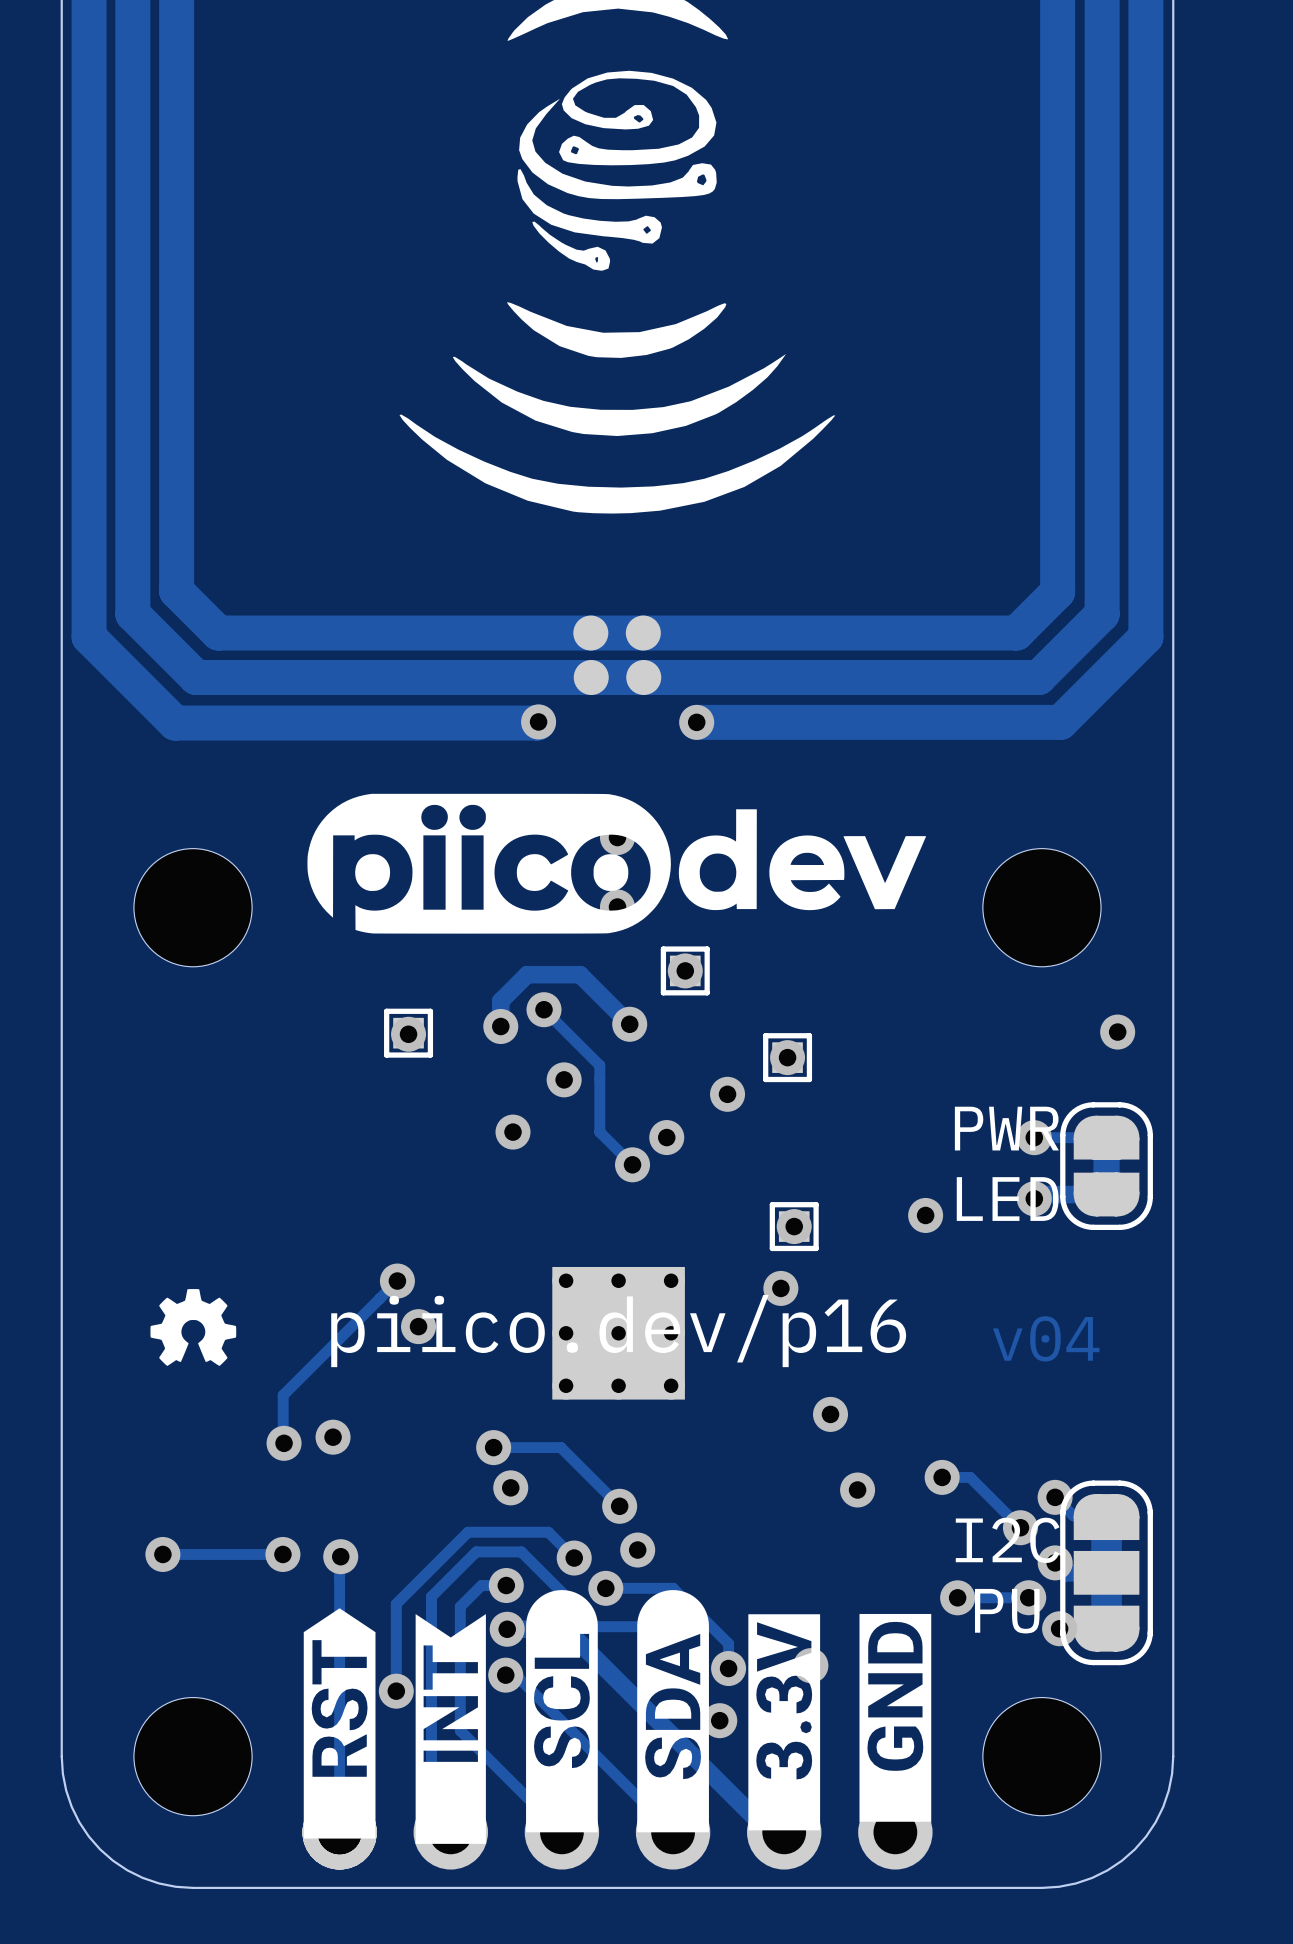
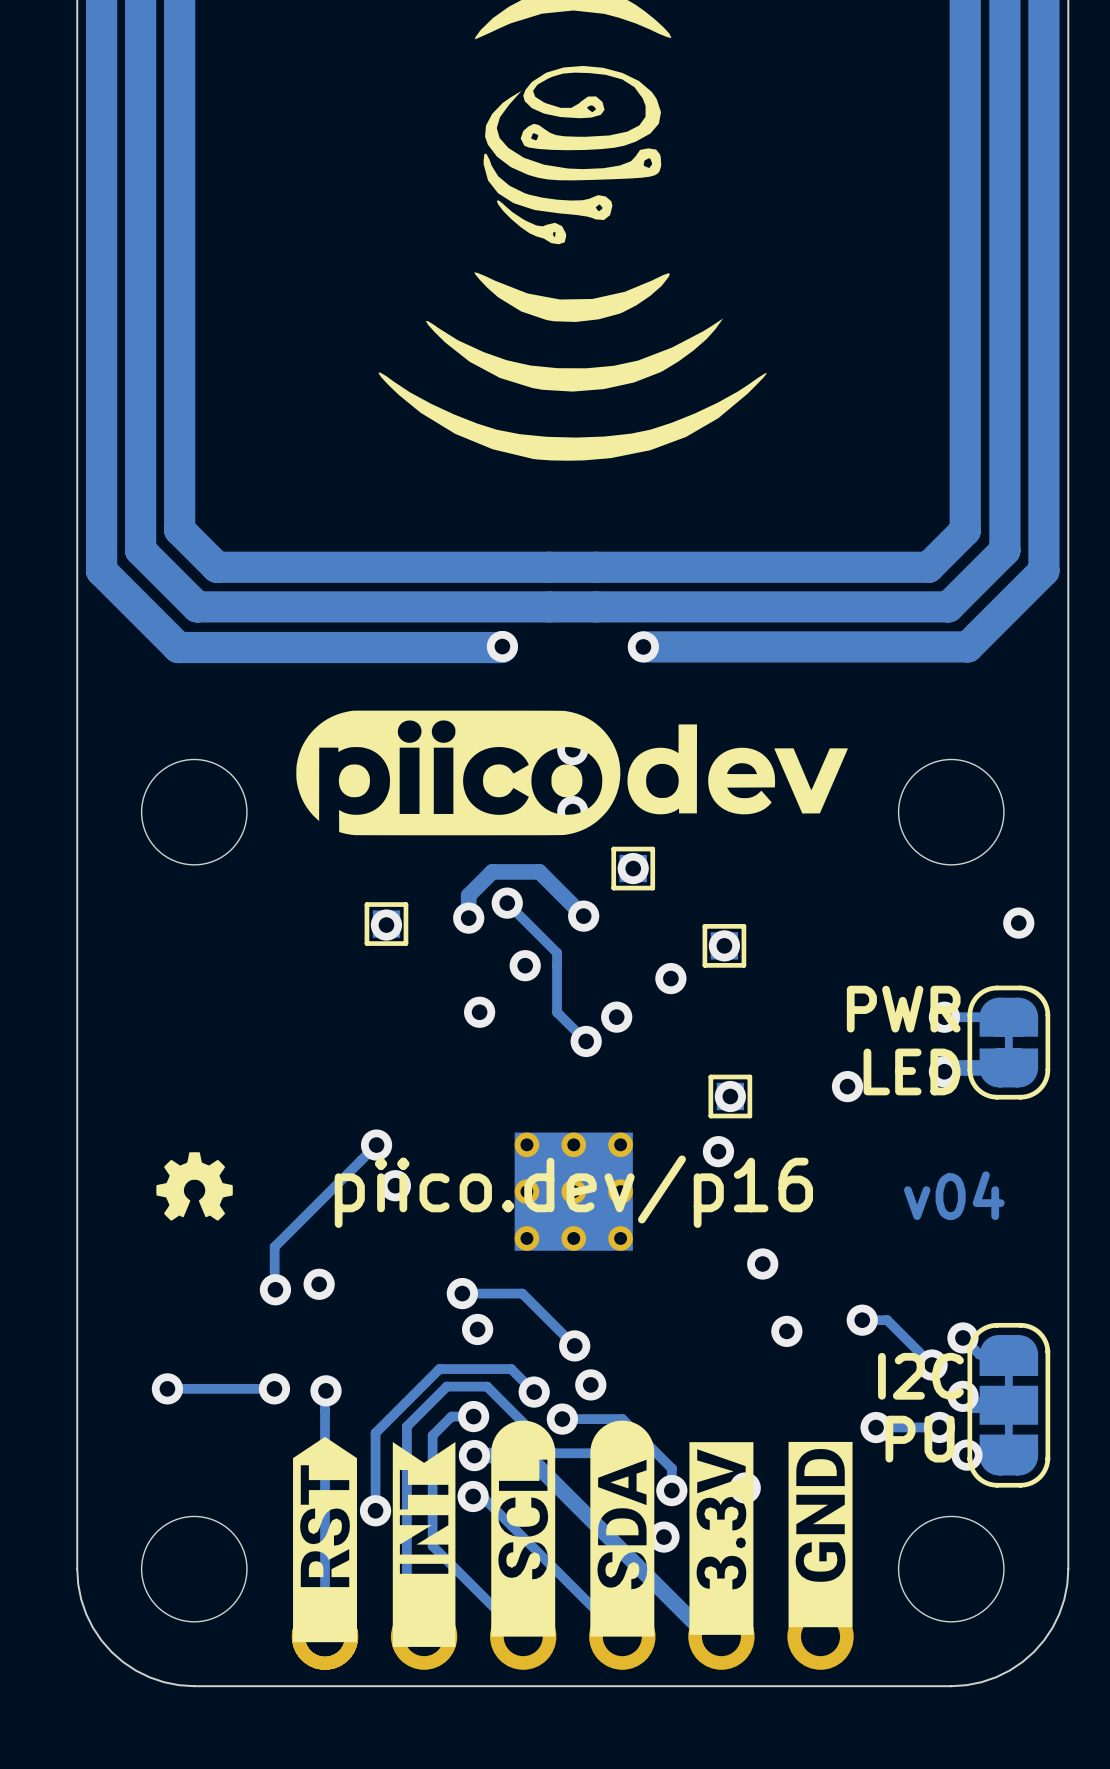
part footprint: [1060, 1102, 1153, 1230] -> [967, 985, 1051, 1100]
part footprint: [1060, 1480, 1153, 1666] -> [967, 1322, 1051, 1488]

